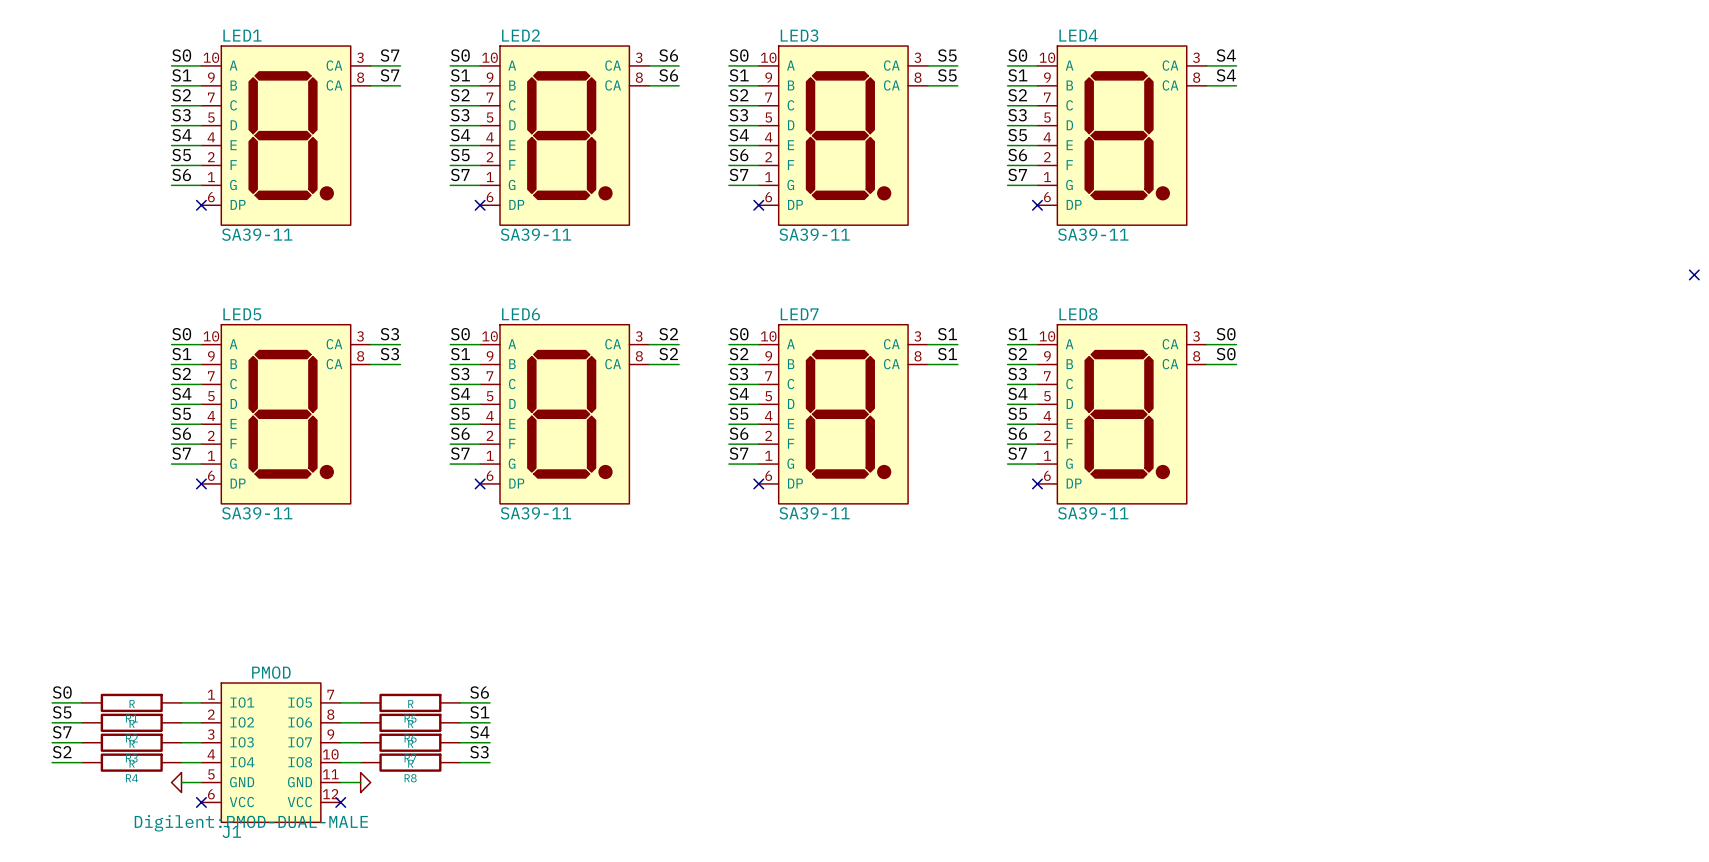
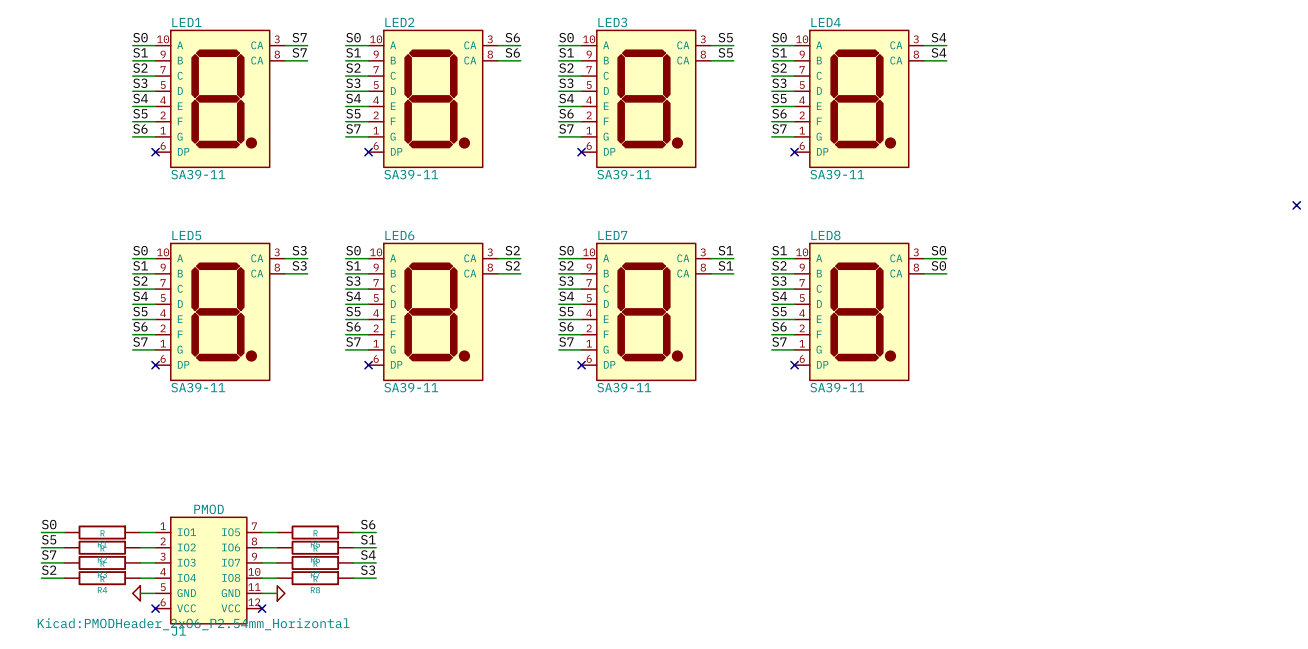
J1 text: Digilent:PMOD-DUAL-MALE (251, 823) -> Kicad:PMODHeader_2x06_P2.54mm_Horizontal (193, 624)

